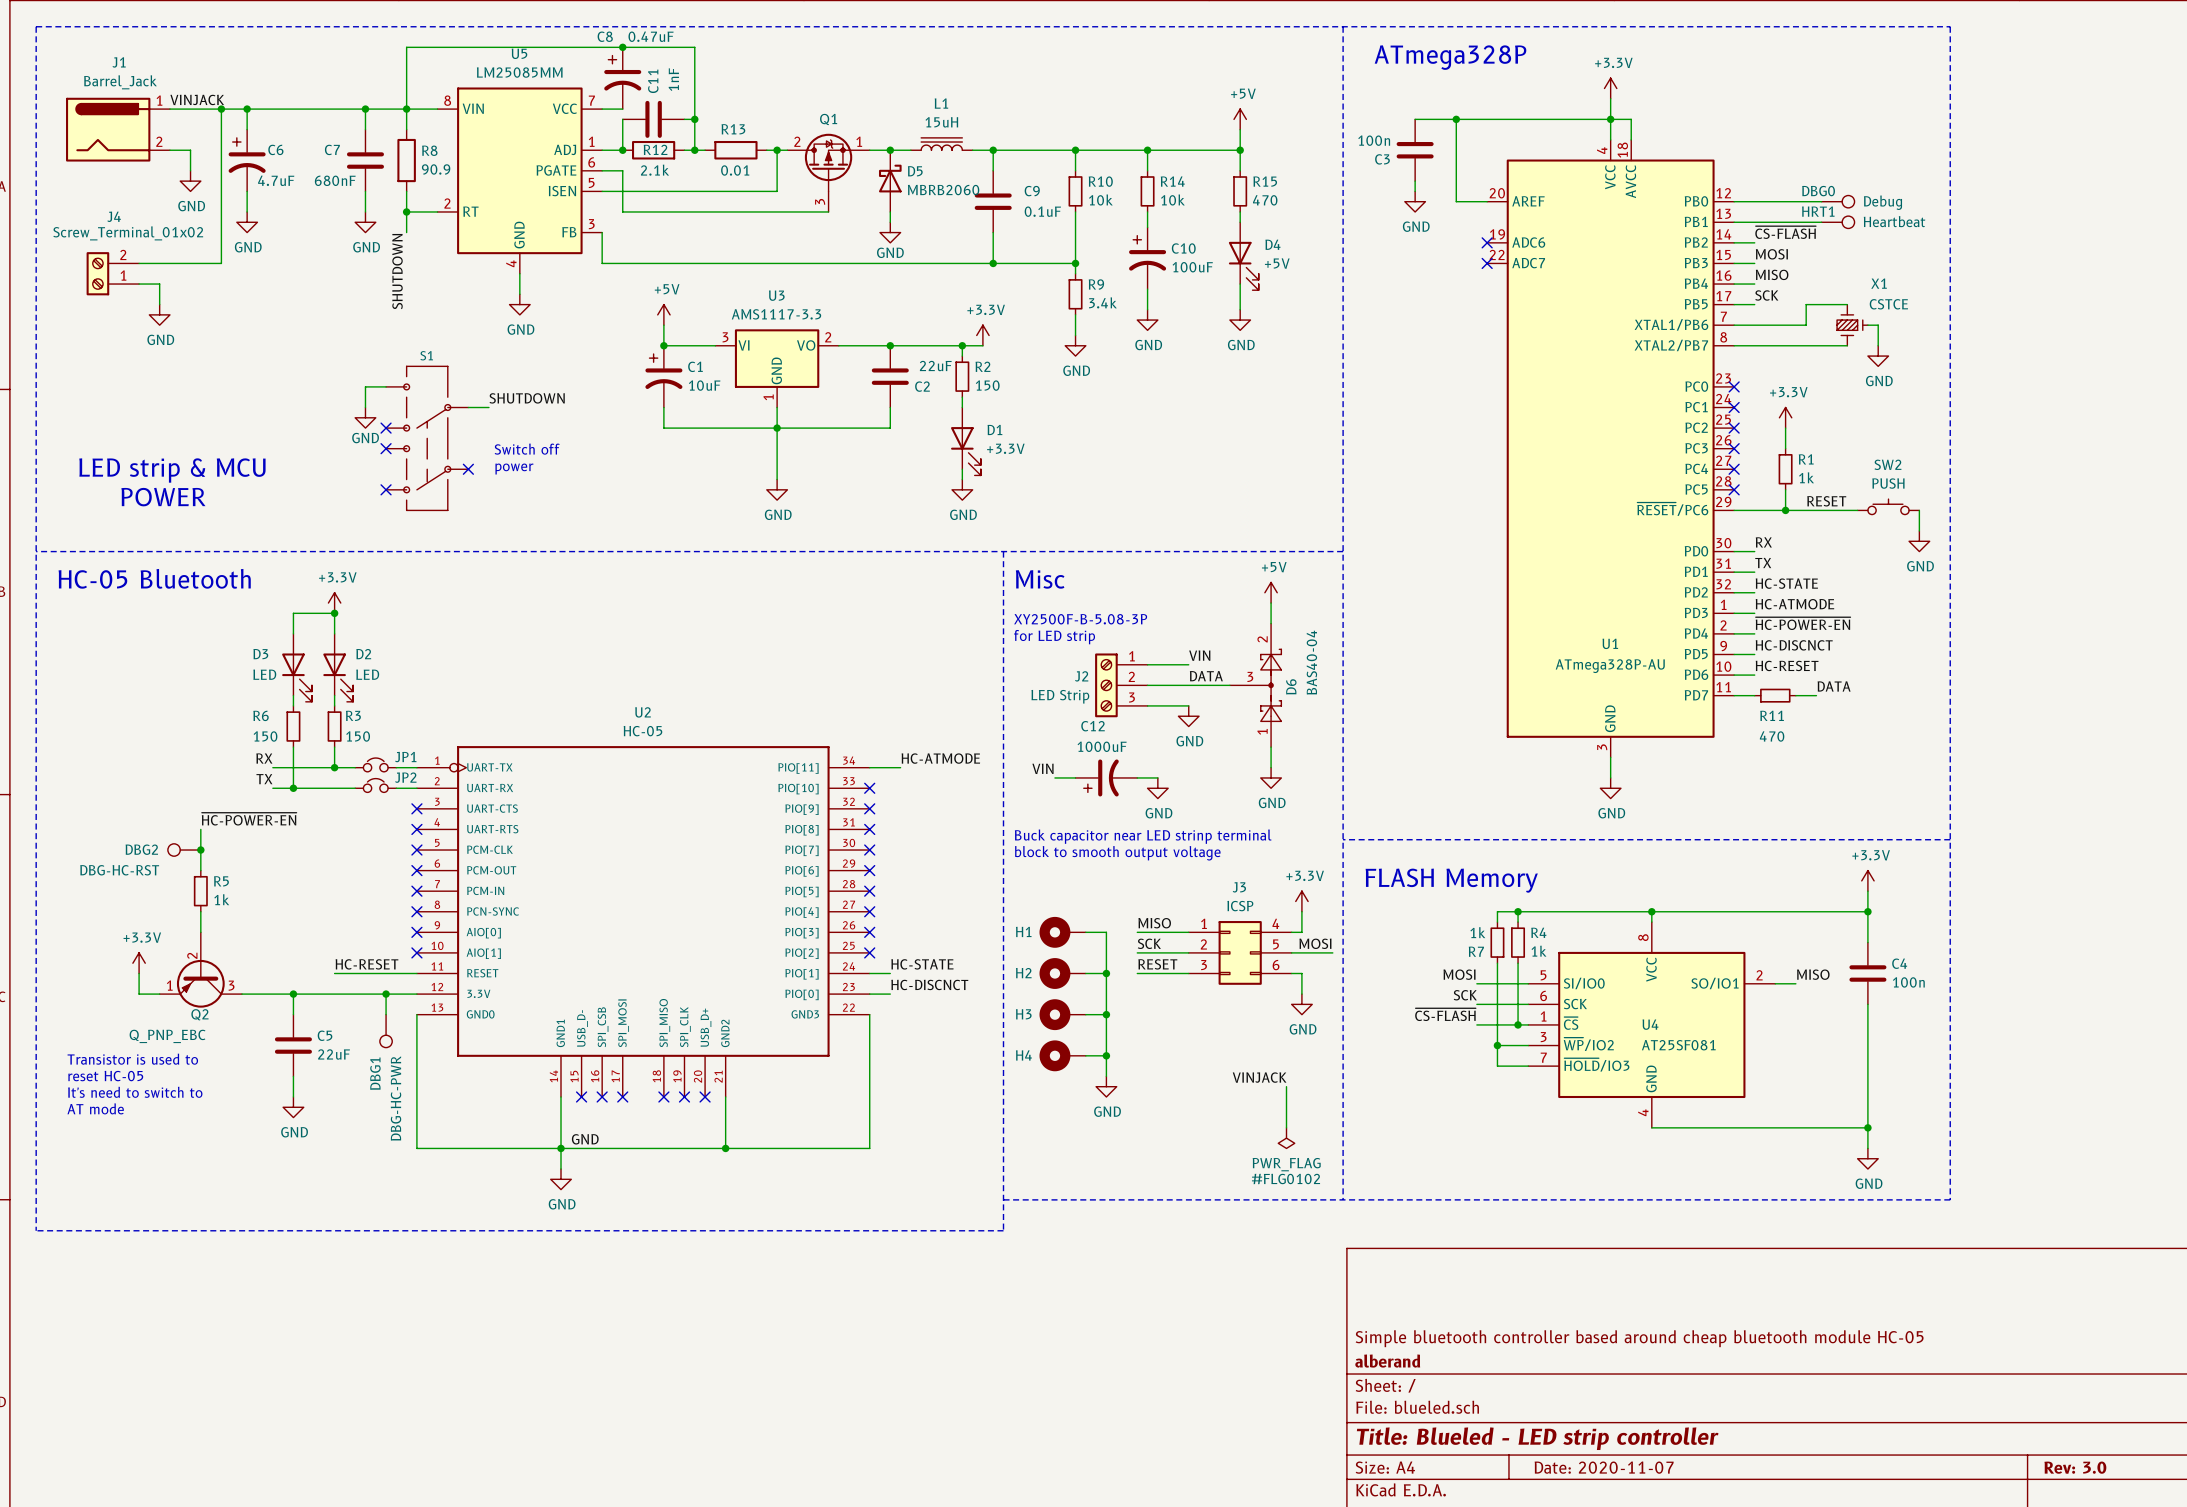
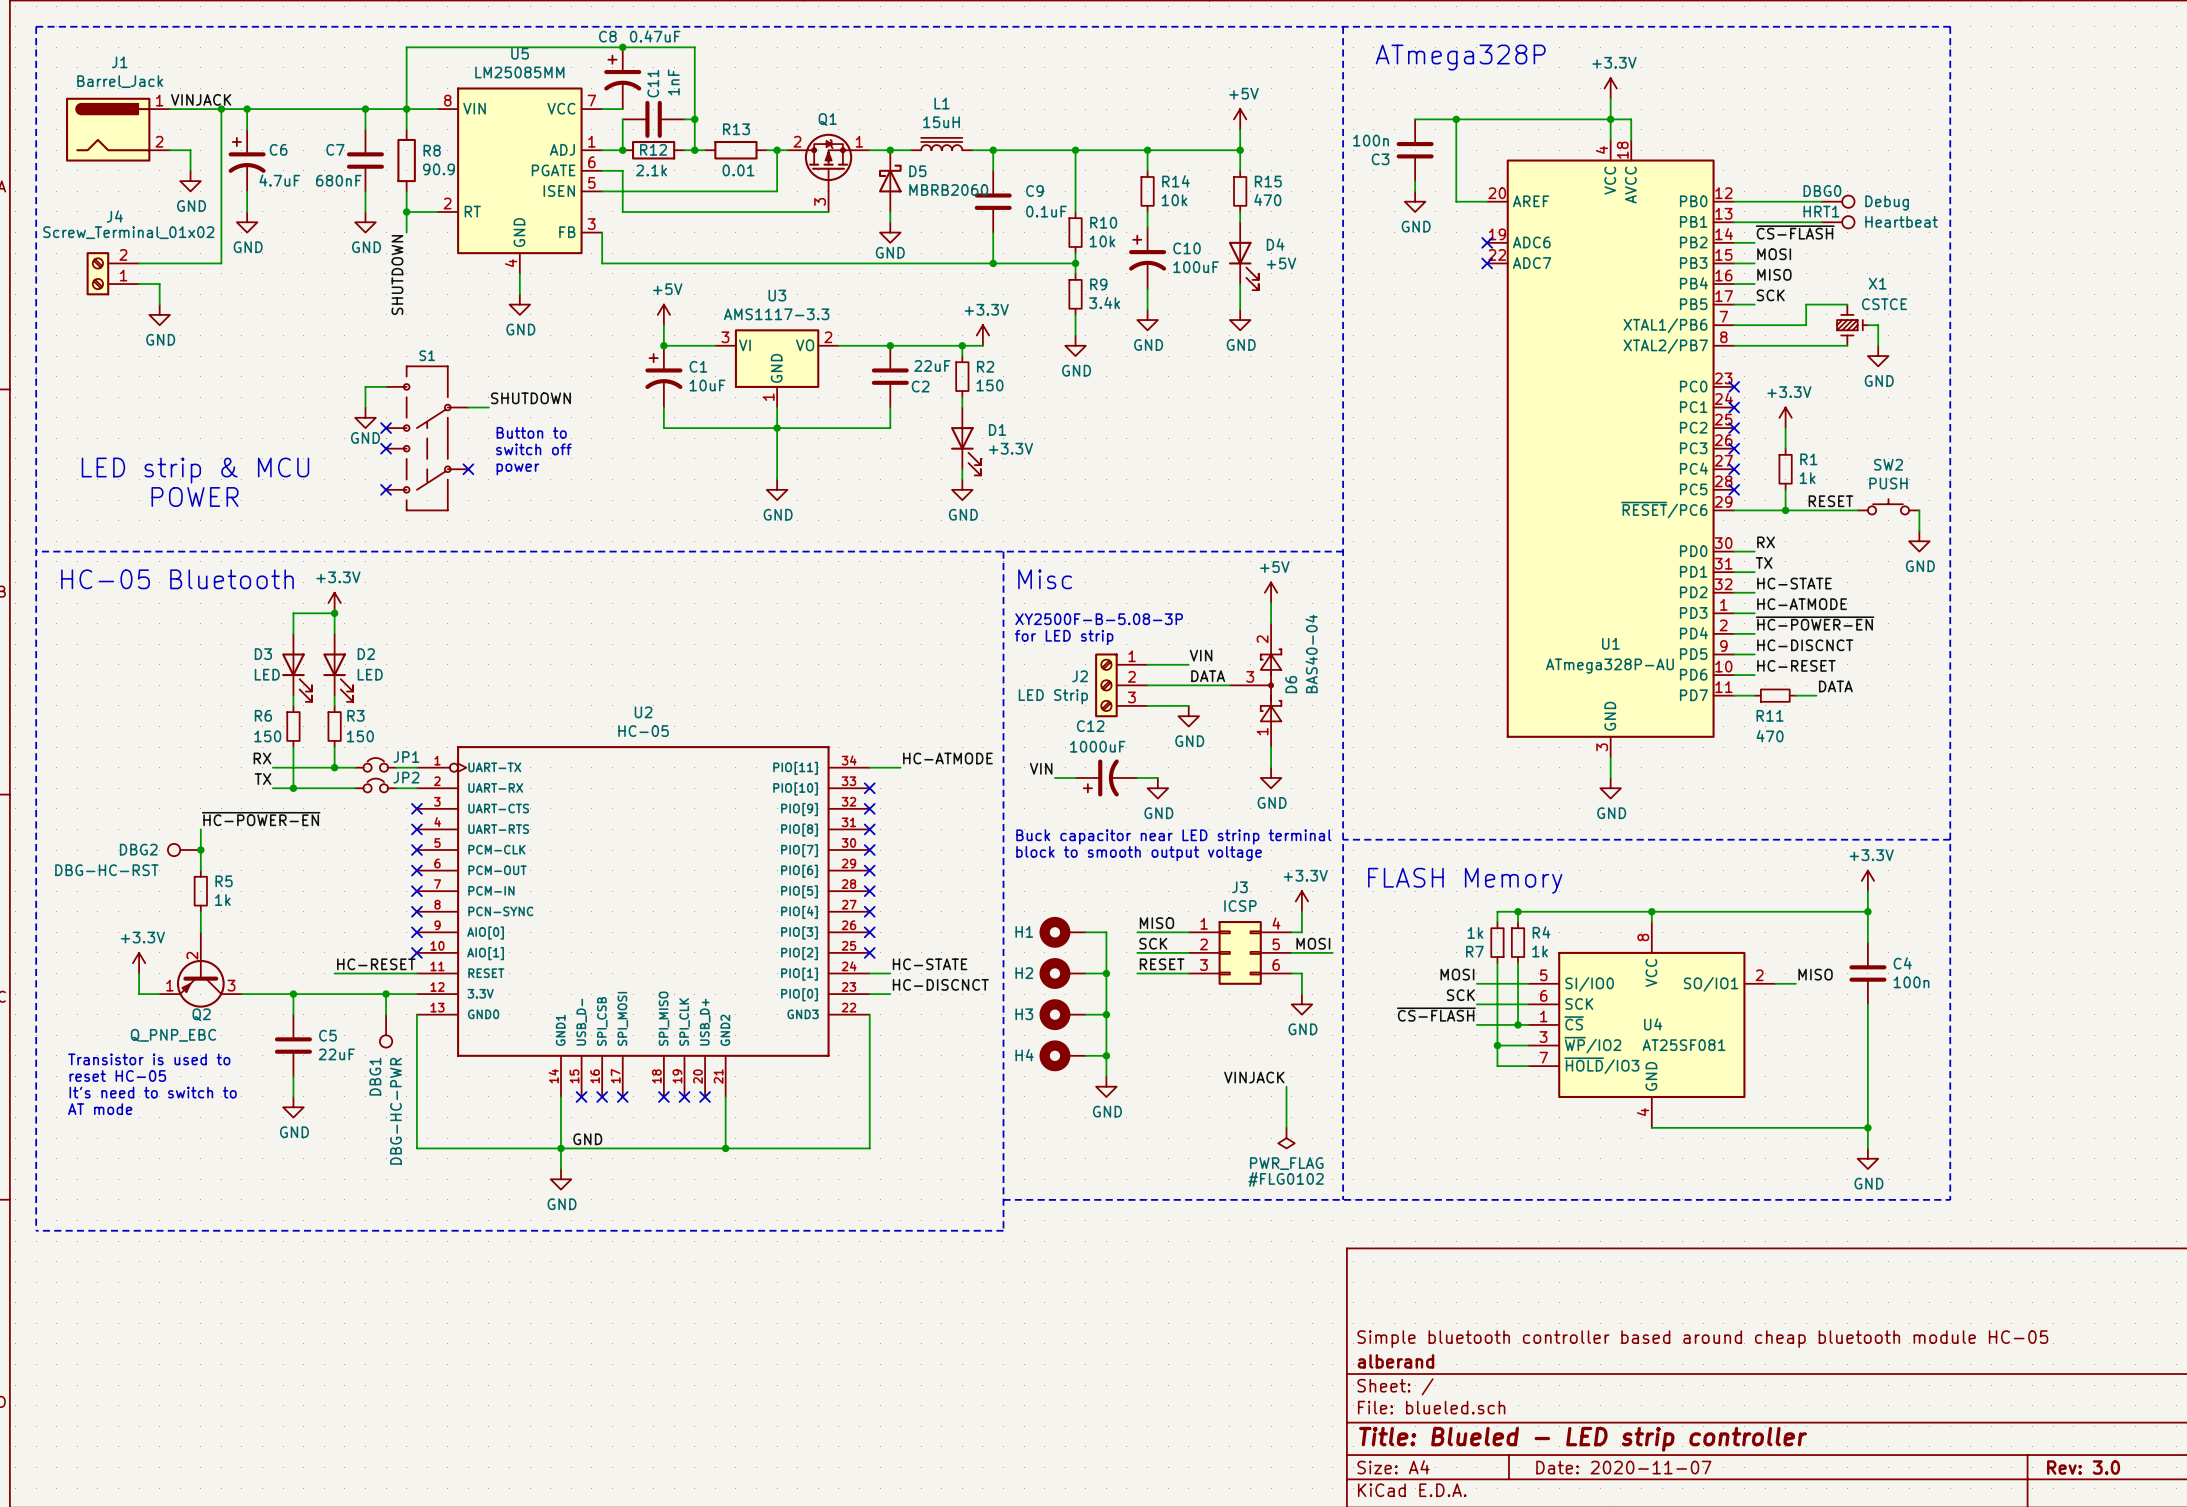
R10 position: (1075, 191) -> (1075, 232)
wire: (1075, 211) (1075, 253) -> (1075, 211) (1075, 170)
text: none -> Button to (531, 432)
text: Switch off (527, 449) -> switch off (533, 449)

